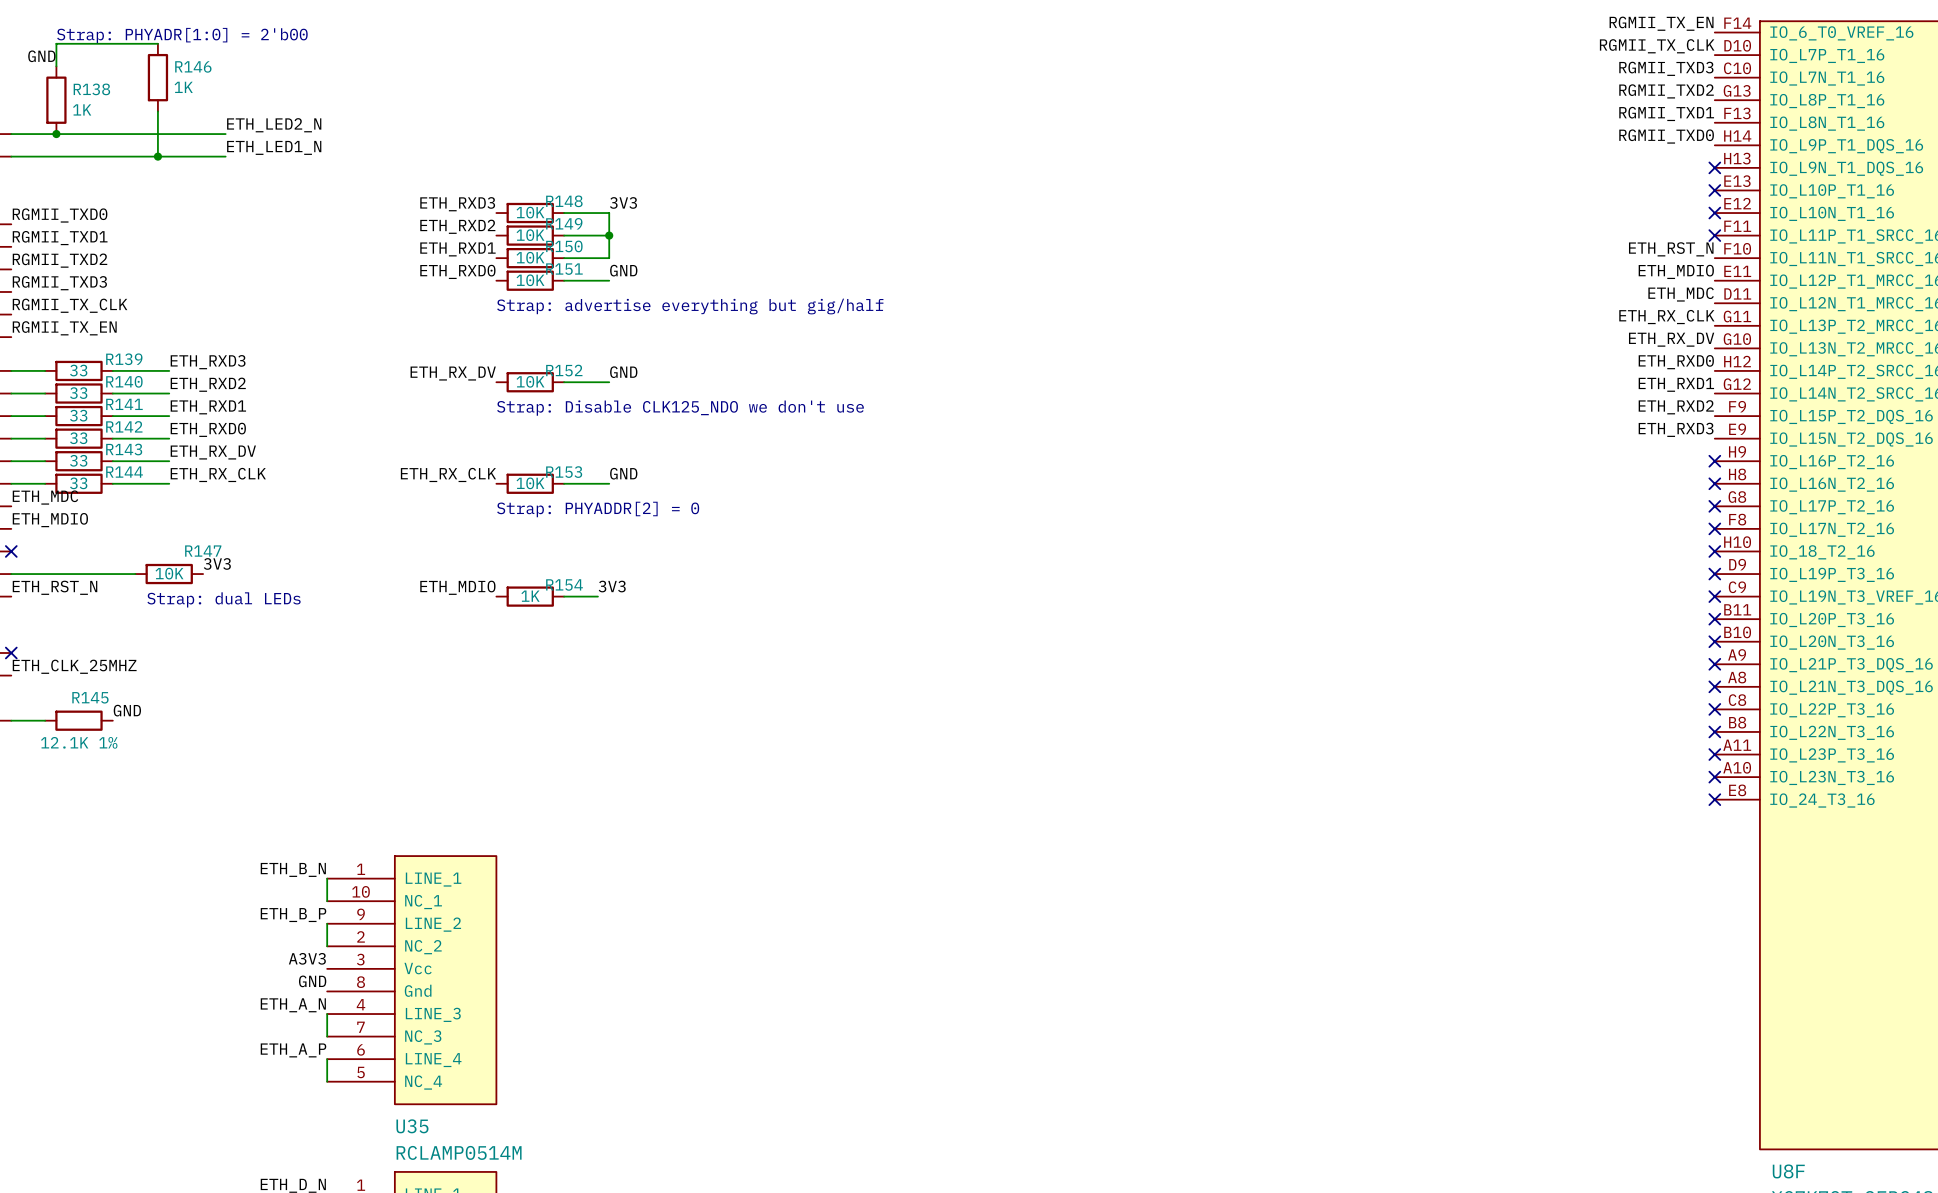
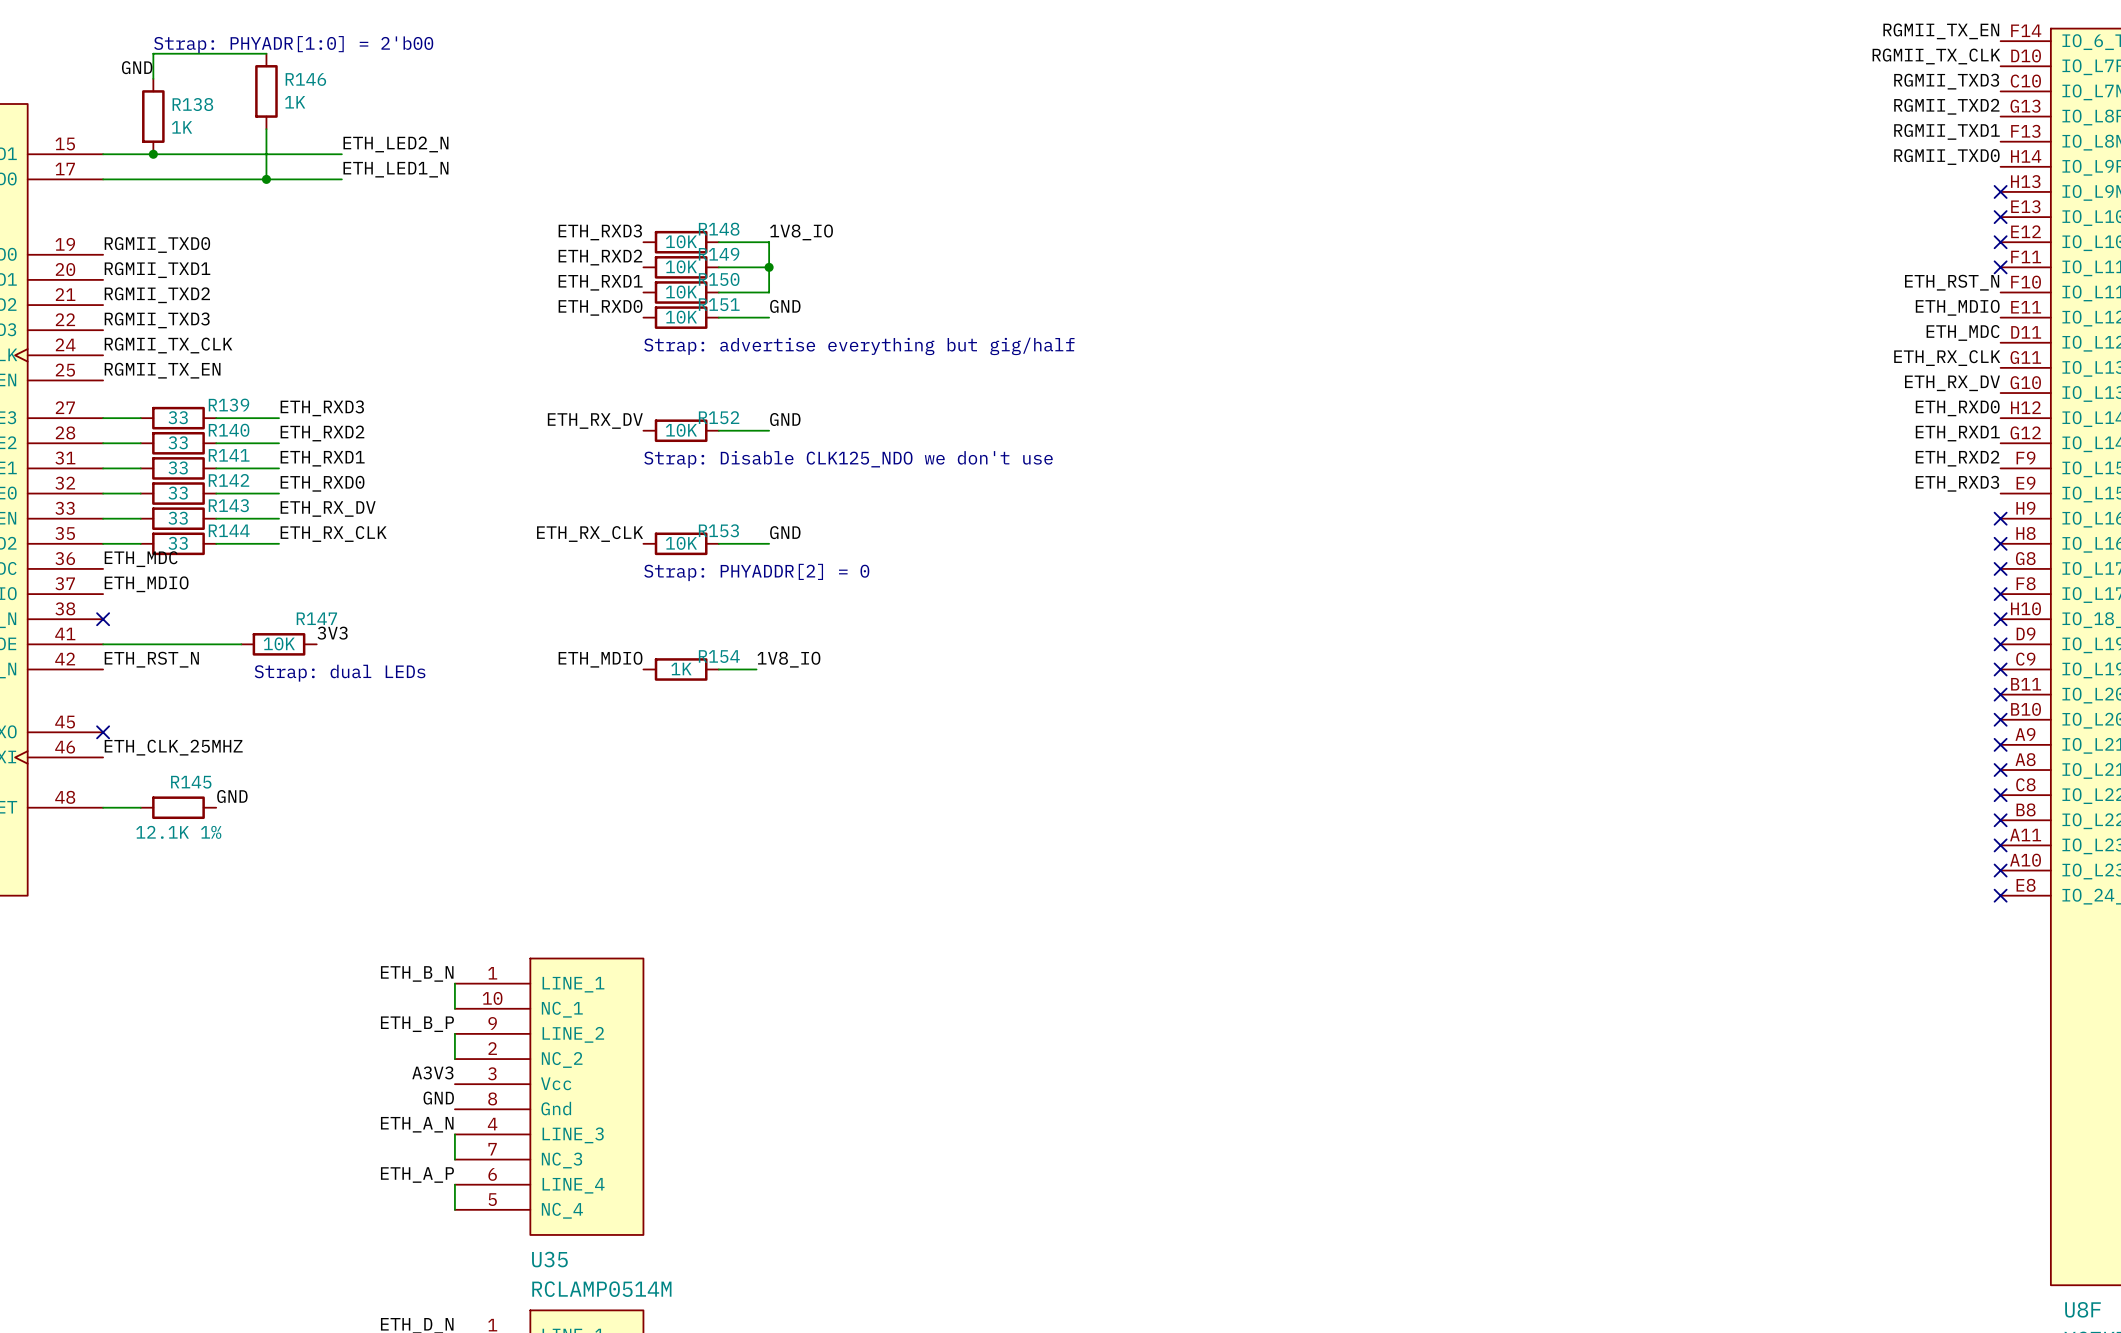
label: 3V3 (623, 202) -> 1V8_IO (801, 232)
label: 3V3 (612, 586) -> 1V8_IO (788, 659)

